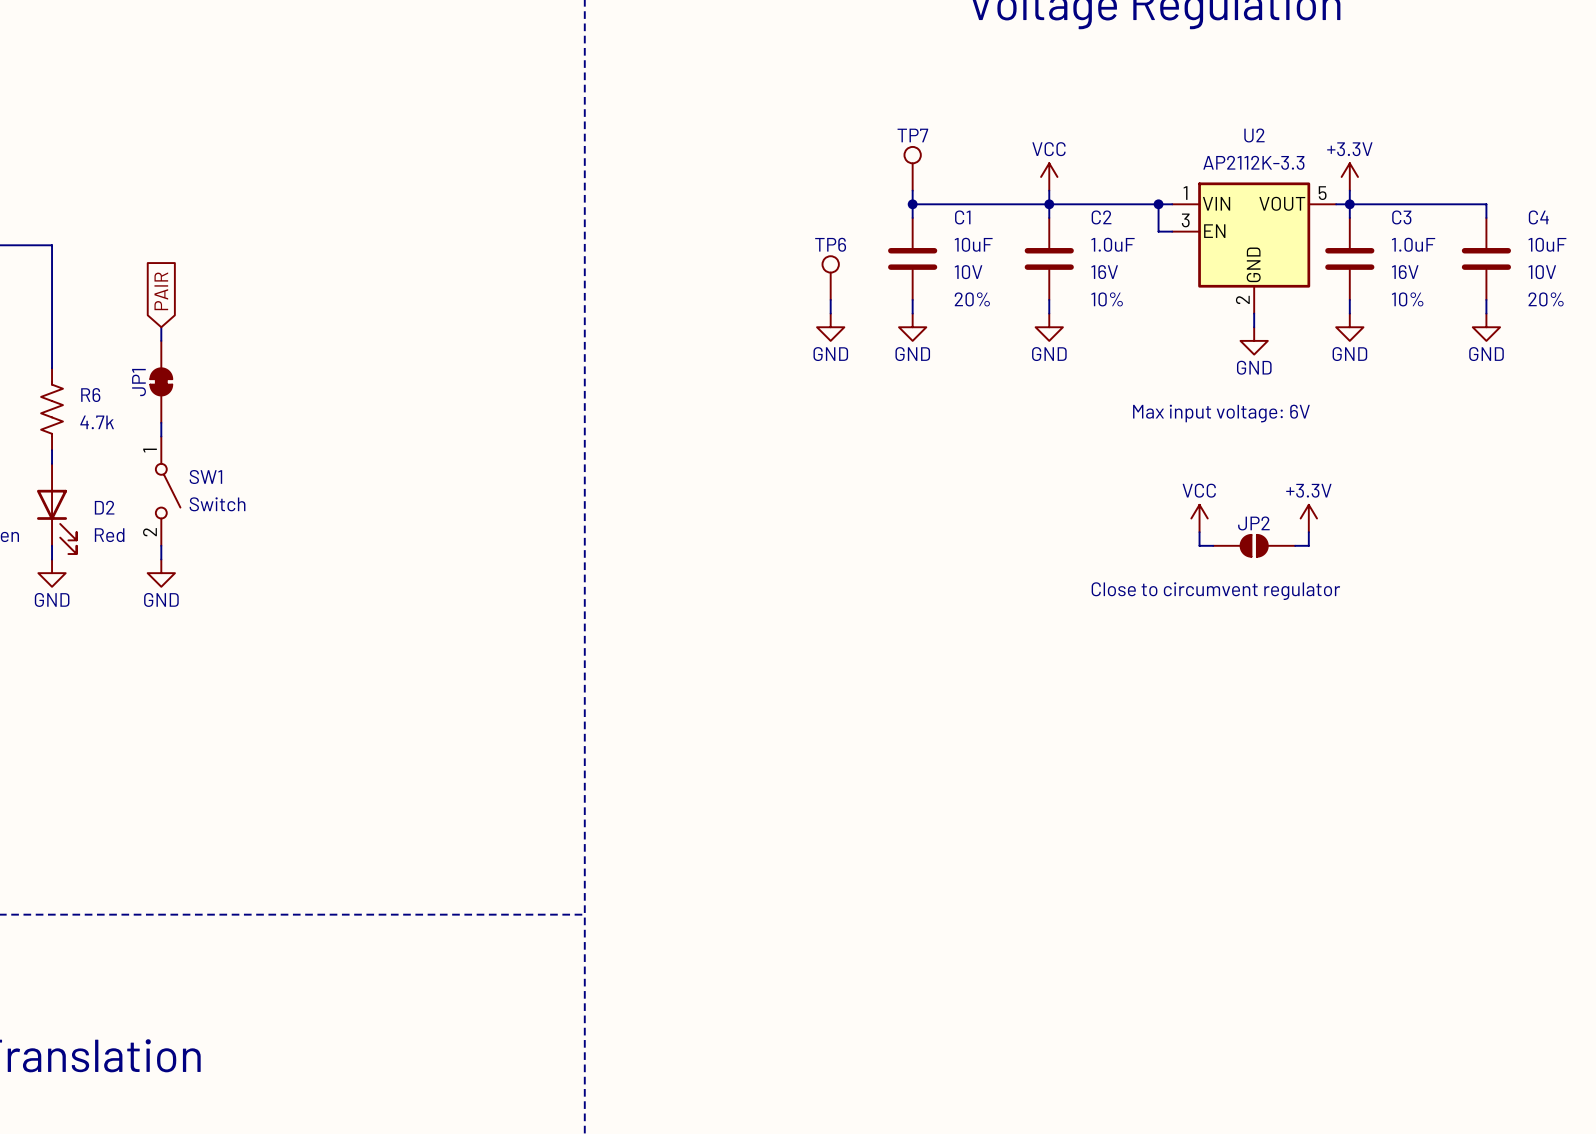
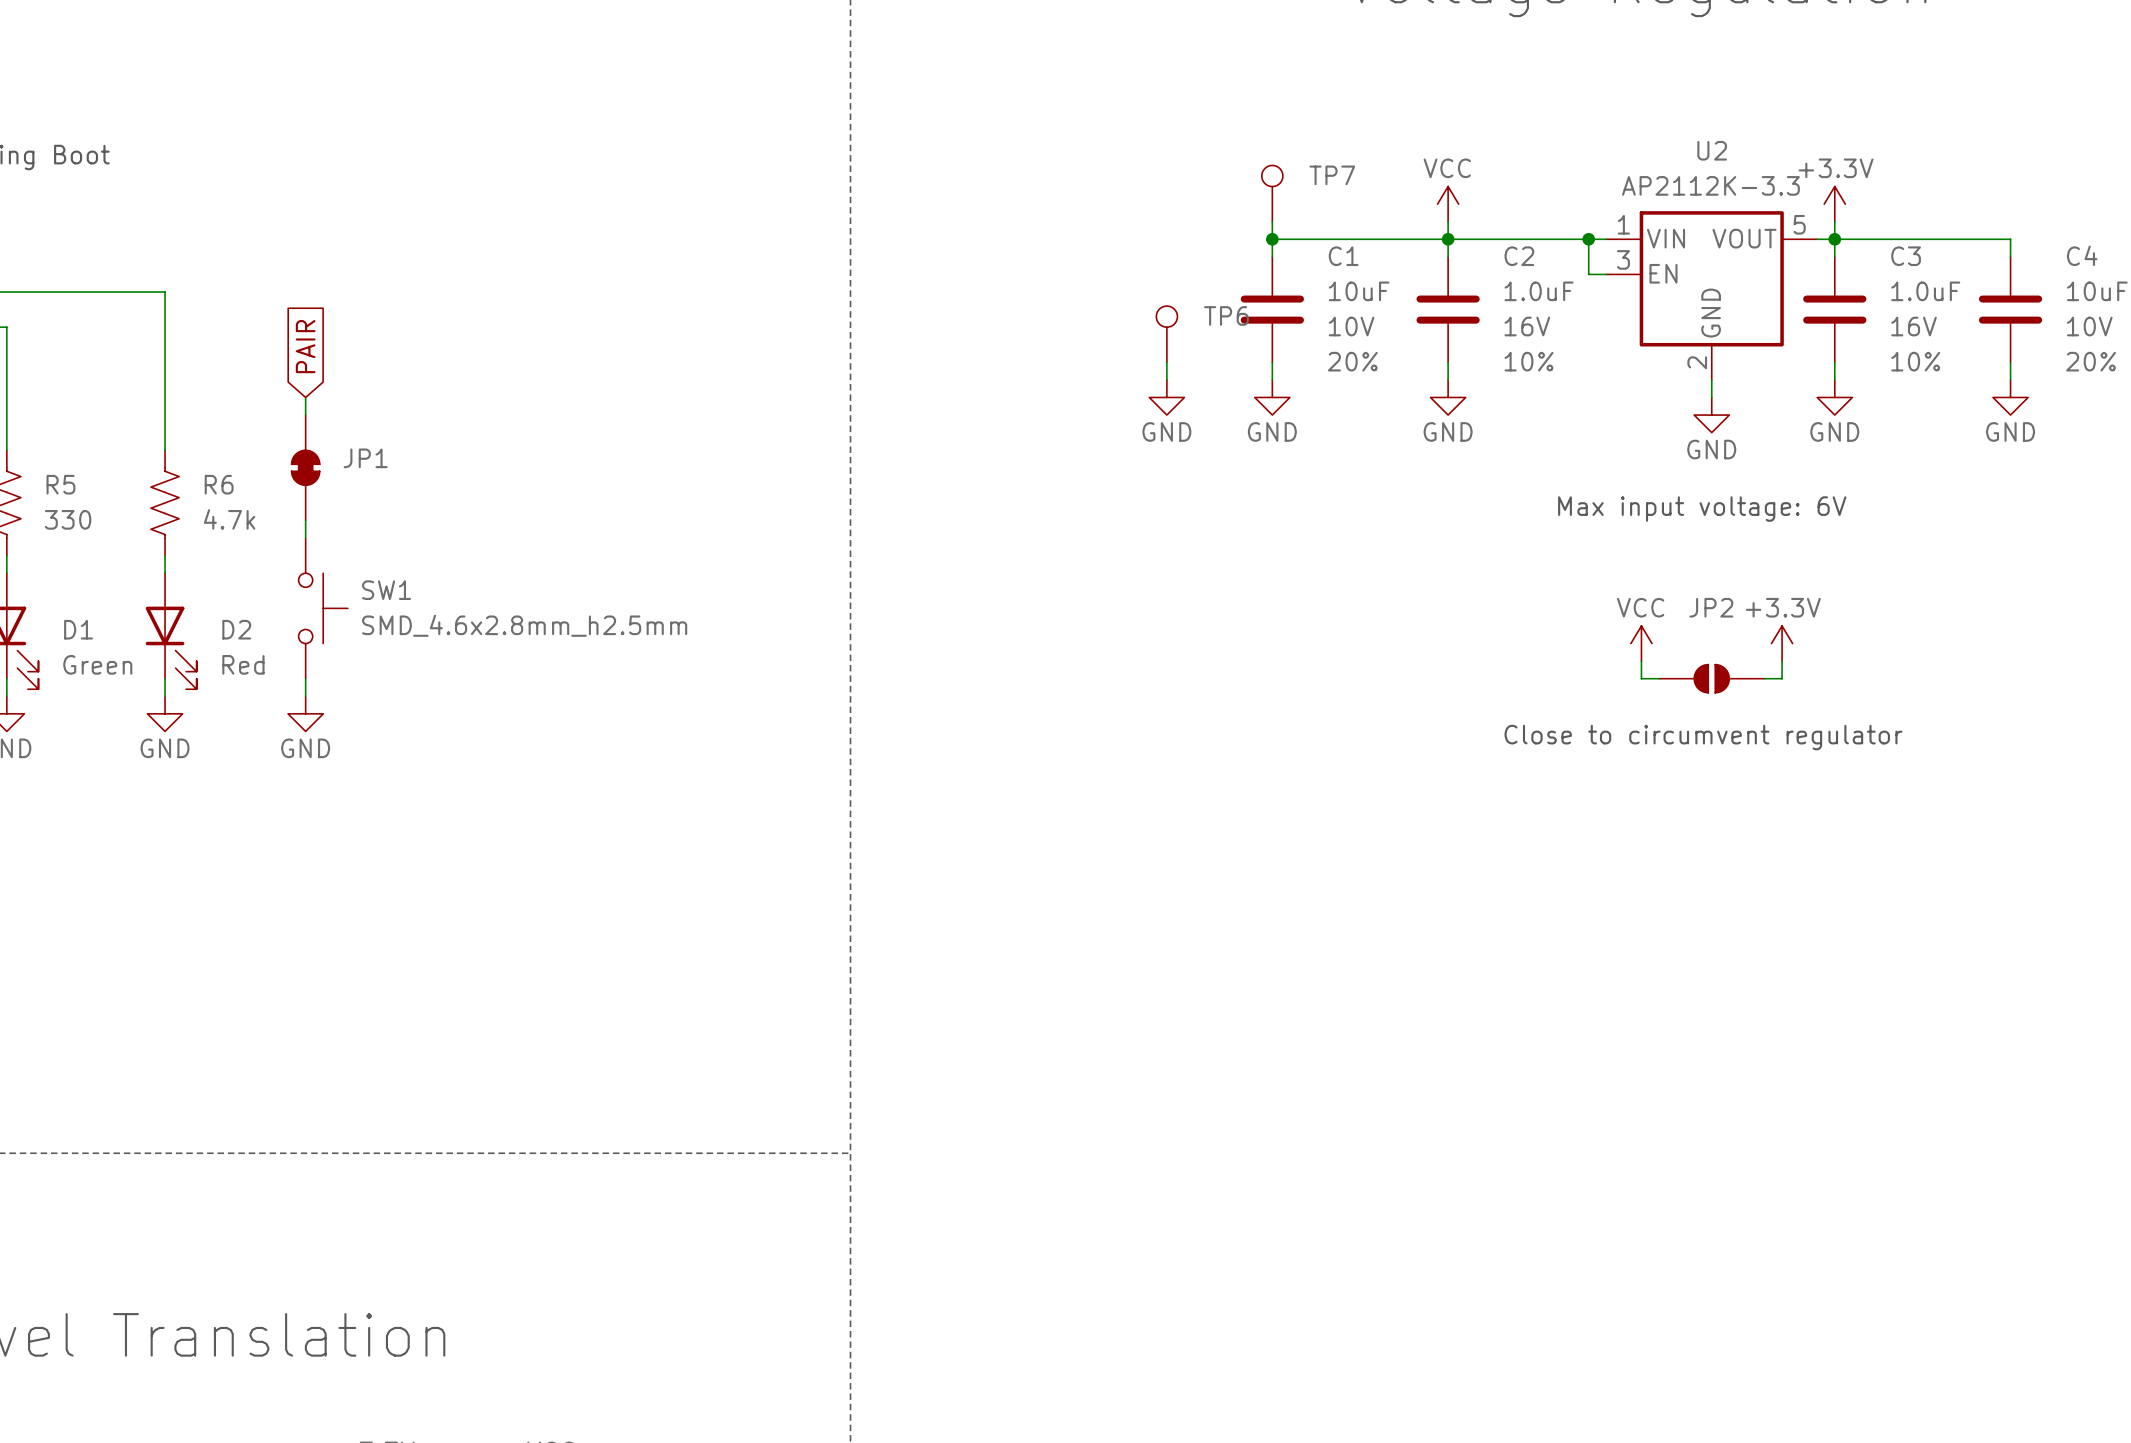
TP7 name position: TP7 (912, 135) -> TP7 (1332, 175)
TP6 name position: TP6 (830, 244) -> TP6 (1226, 315)
JP1 name rotation: 0° (139, 382) -> 90° clockwise (365, 458)
JP1 name position: JP1 (139, 382) -> JP1 (365, 458)
SW1 symbol: [155, 436, 181, 546] -> [298, 538, 348, 679]
SW1 value: Switch (217, 504) -> SMD_4.6x2.8mm_h2.5mm (524, 625)
JP2 name position: JP2 (1253, 523) -> JP2 (1711, 607)

